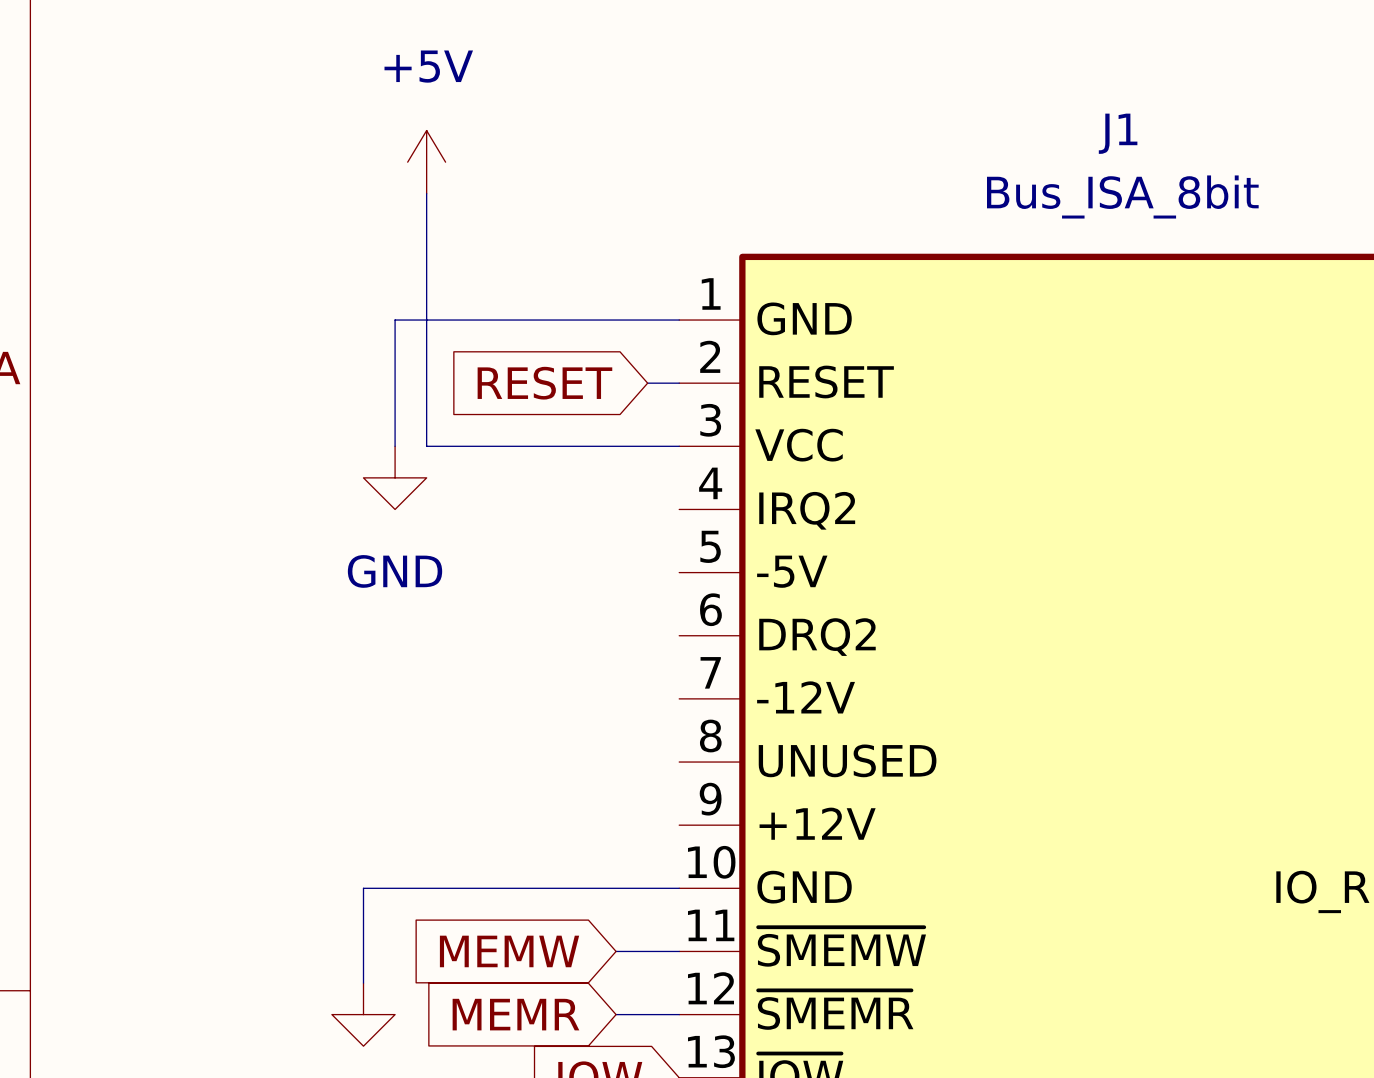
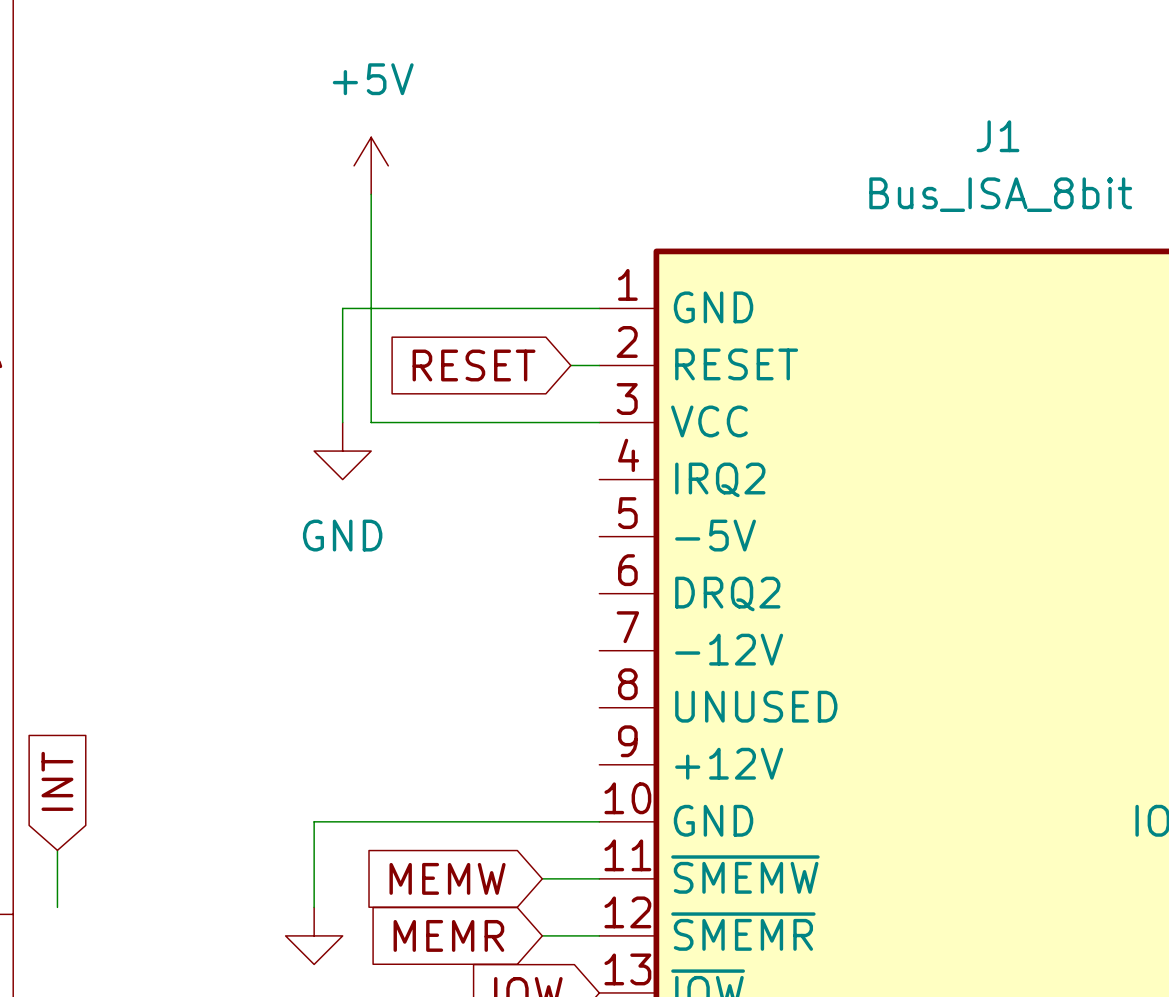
global label: none -> INT (57, 781)
wire: none -> (57, 850) (57, 907)

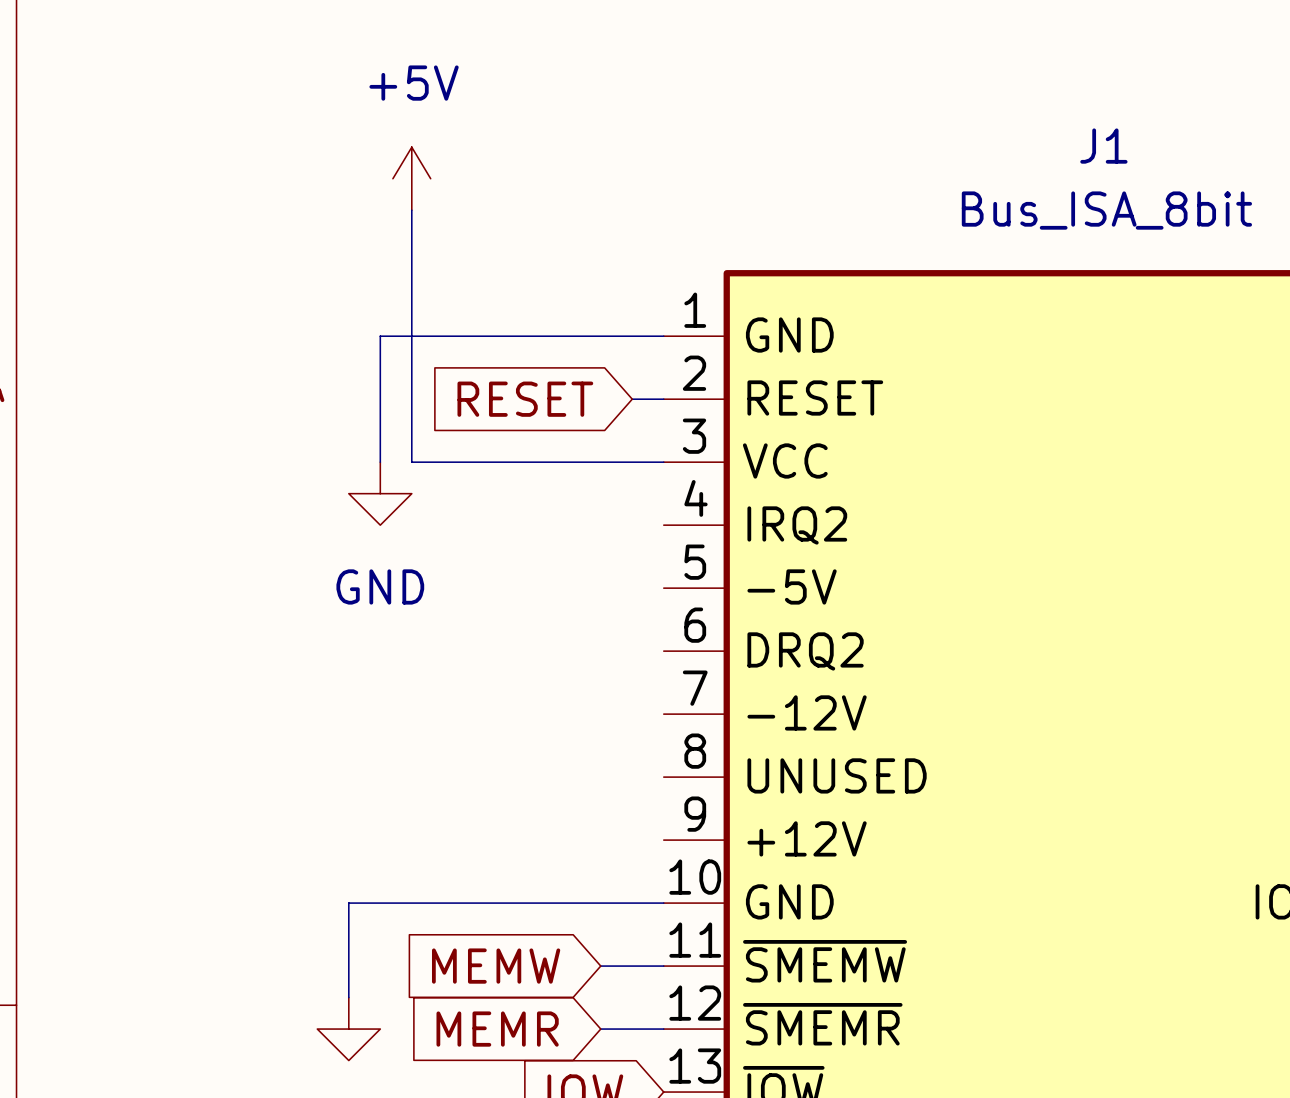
global label: INT (57, 781) -> none
wire: (57, 850) (57, 907) -> none

